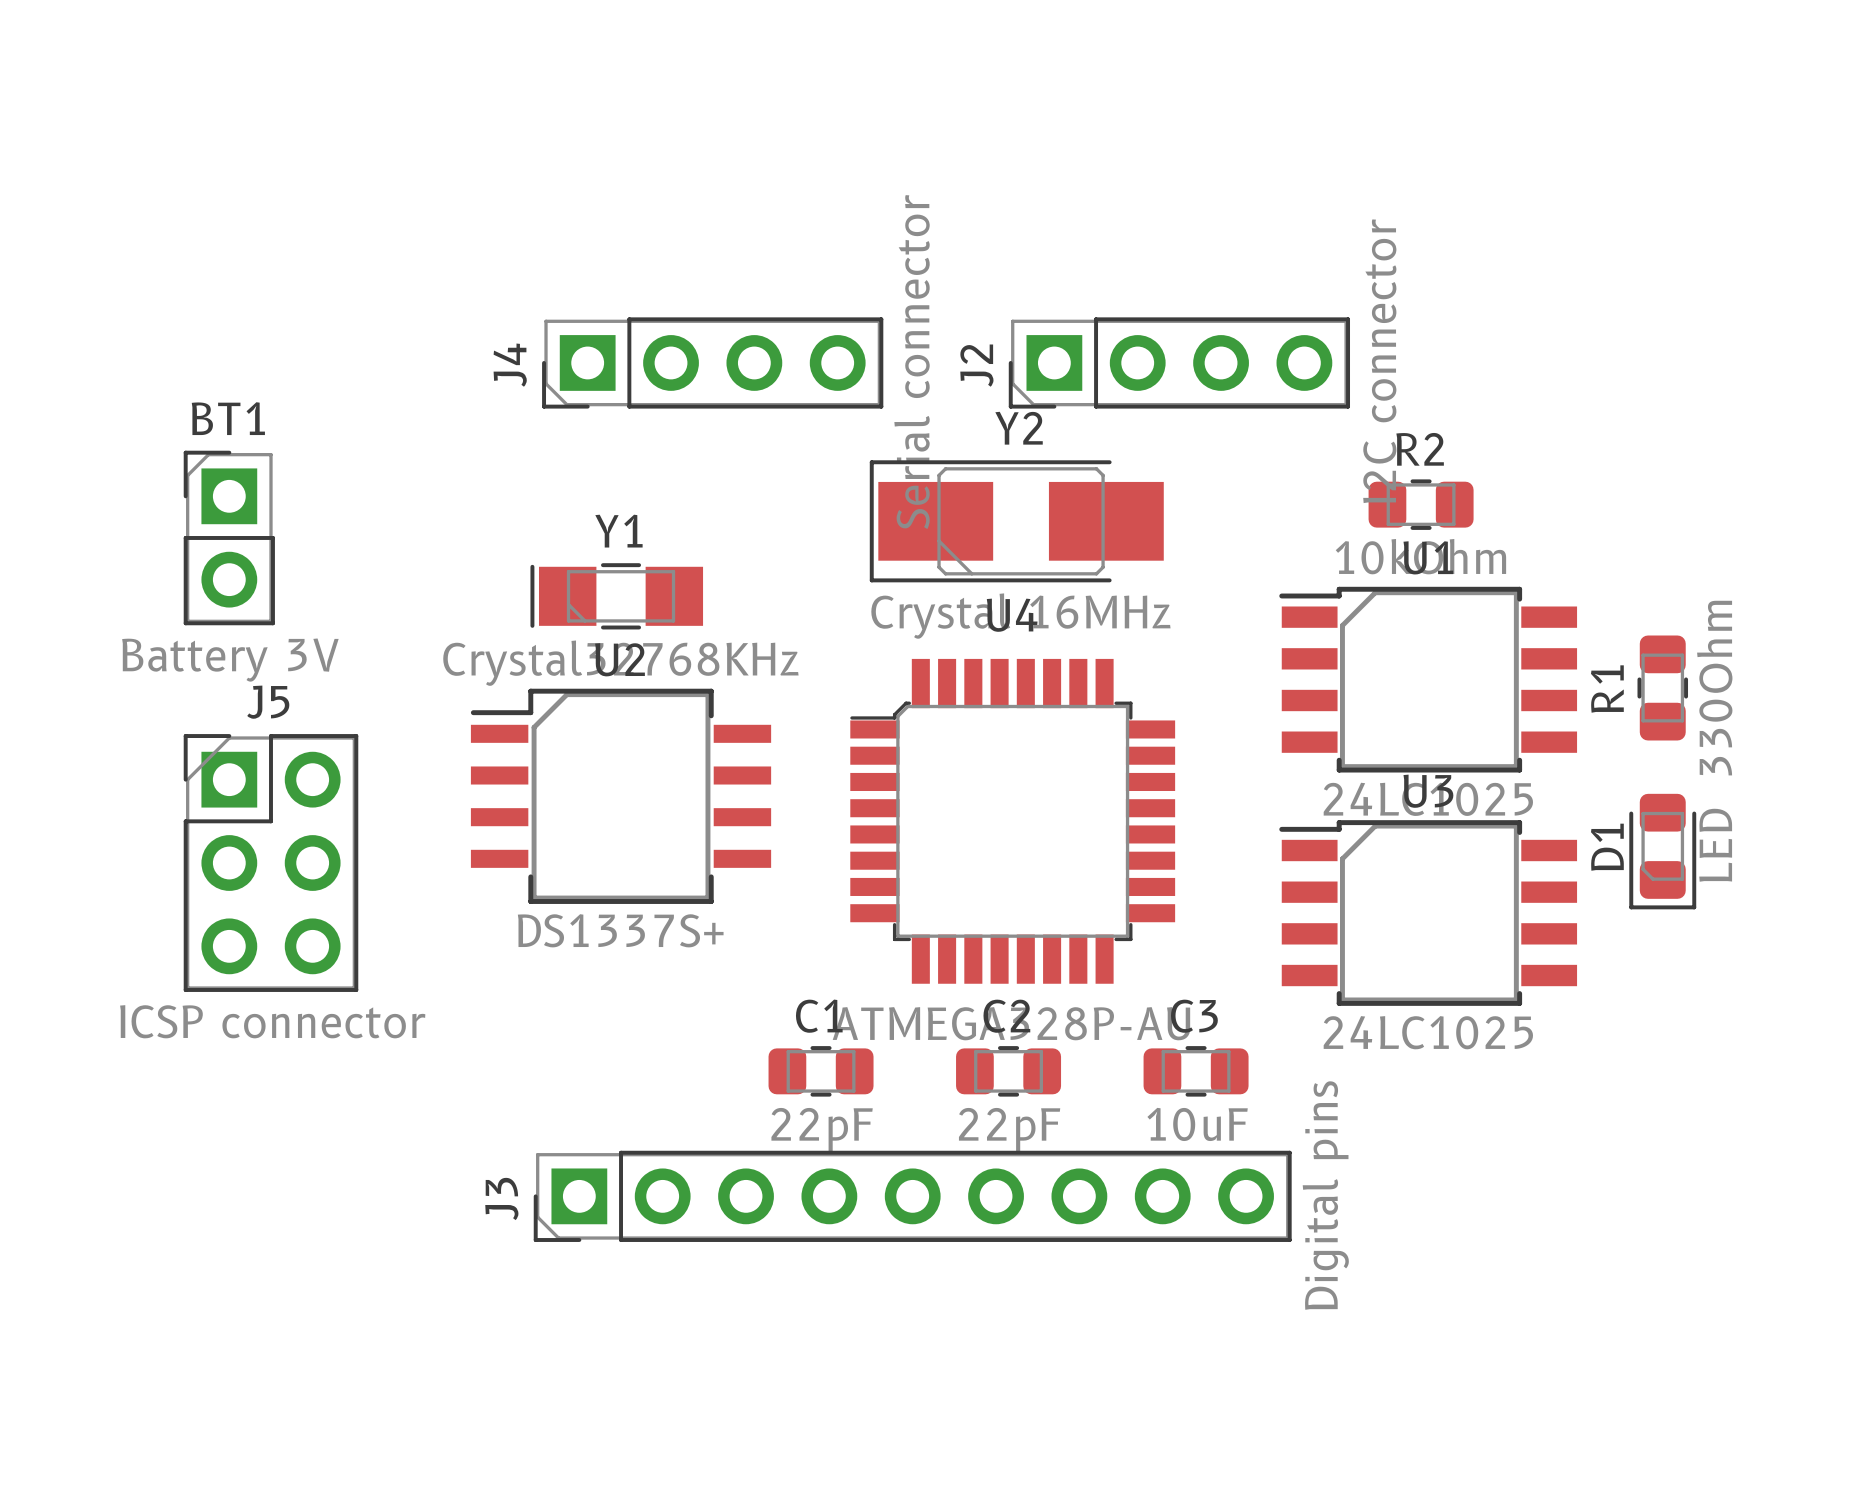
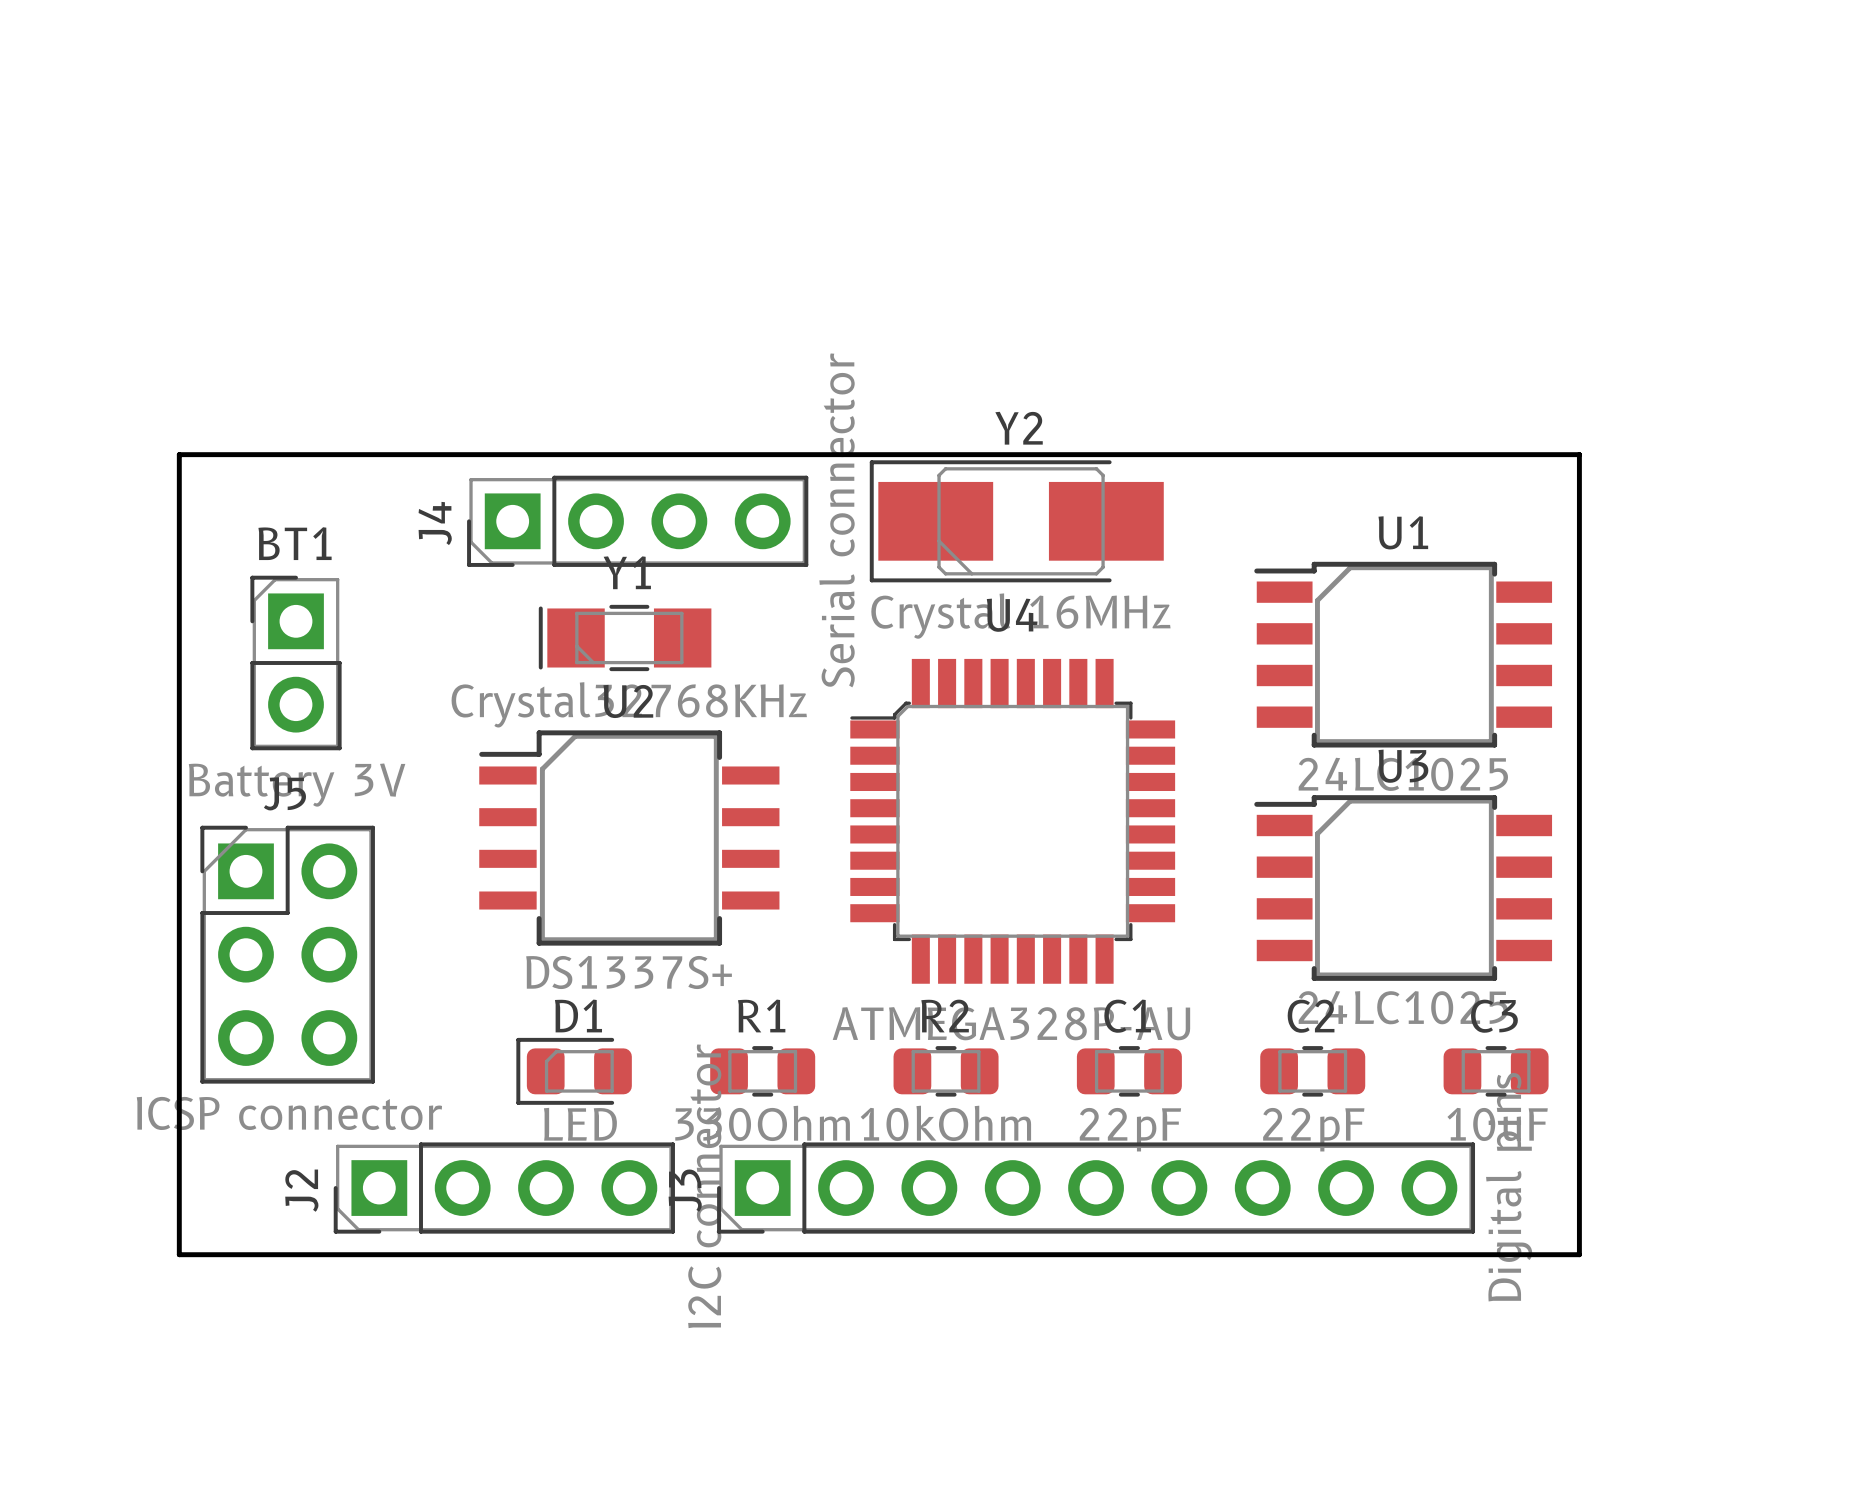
J4 position: (712, 362) -> (637, 521)
J2 position: (1179, 362) -> (504, 1188)
board edge: none -> (179, 454) (1579, 454) (1579, 1254) (179, 1254) (179, 454)
R2 position: (1421, 504) -> (946, 1071)
BT1 position: (229, 537) -> (295, 662)
Y1 position: (616, 596) -> (625, 637)
U1 position: (1428, 679) -> (1403, 654)
R1 rotation: 0° (1662, 687) -> 90° clockwise (762, 1071)
R1 position: (1662, 687) -> (762, 1071)
U2 position: (621, 796) -> (629, 838)
D1 rotation: 0° (1662, 851) -> 90° clockwise (574, 1071)
D1 position: (1662, 851) -> (574, 1071)
J5 position: (270, 863) -> (287, 954)
U3 position: (1428, 913) -> (1403, 888)
C1 position: (821, 1071) -> (1129, 1071)
C2 position: (1008, 1071) -> (1312, 1071)
C3 position: (1196, 1071) -> (1496, 1071)
J3 position: (912, 1196) -> (1096, 1188)

